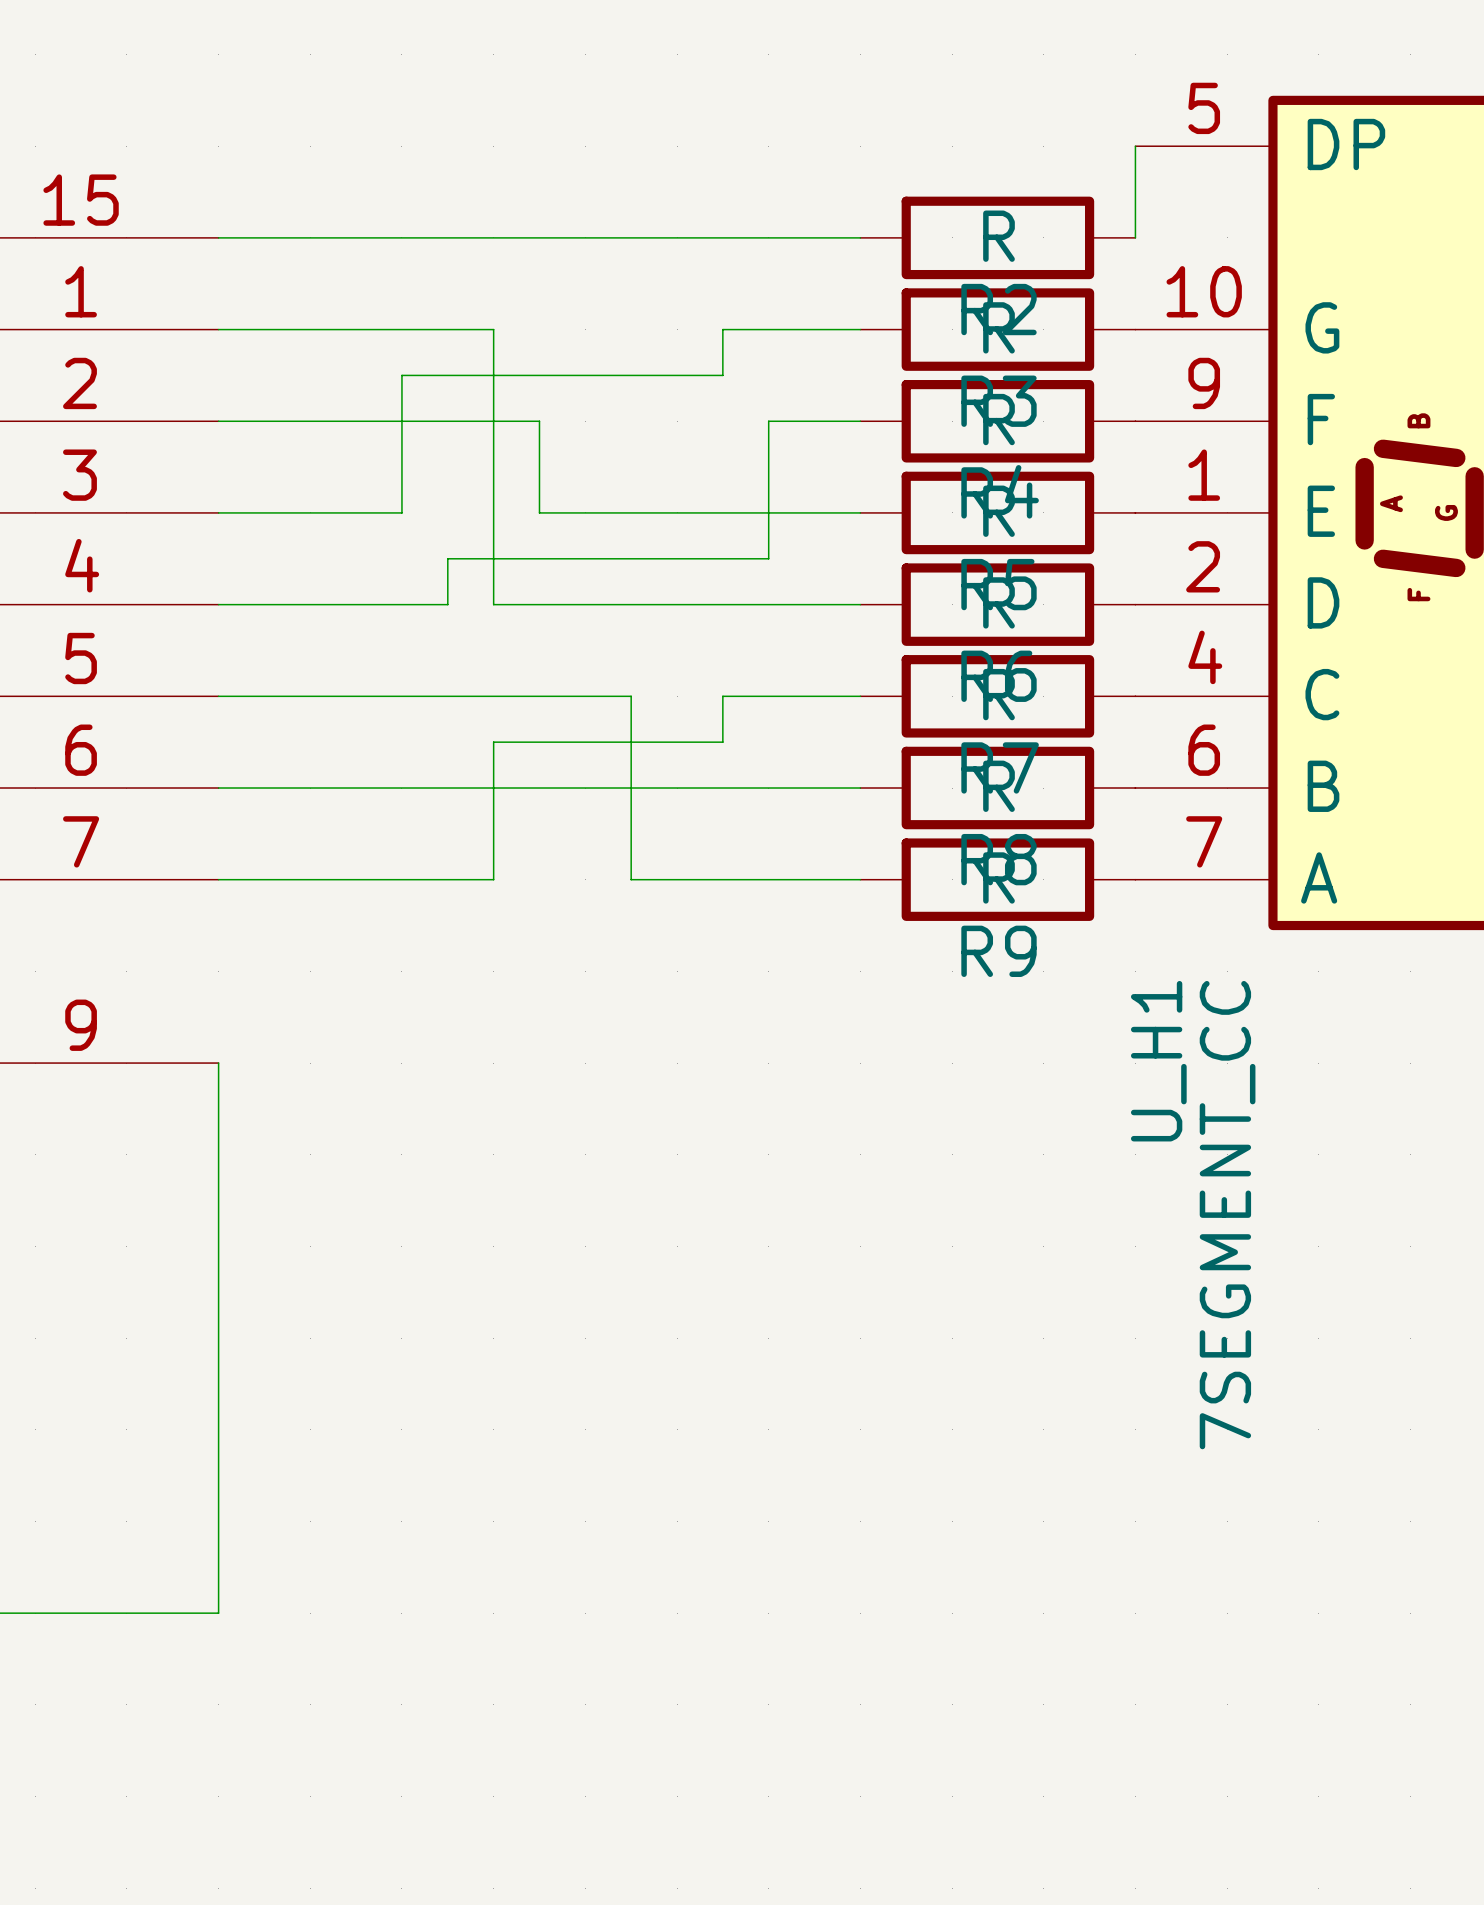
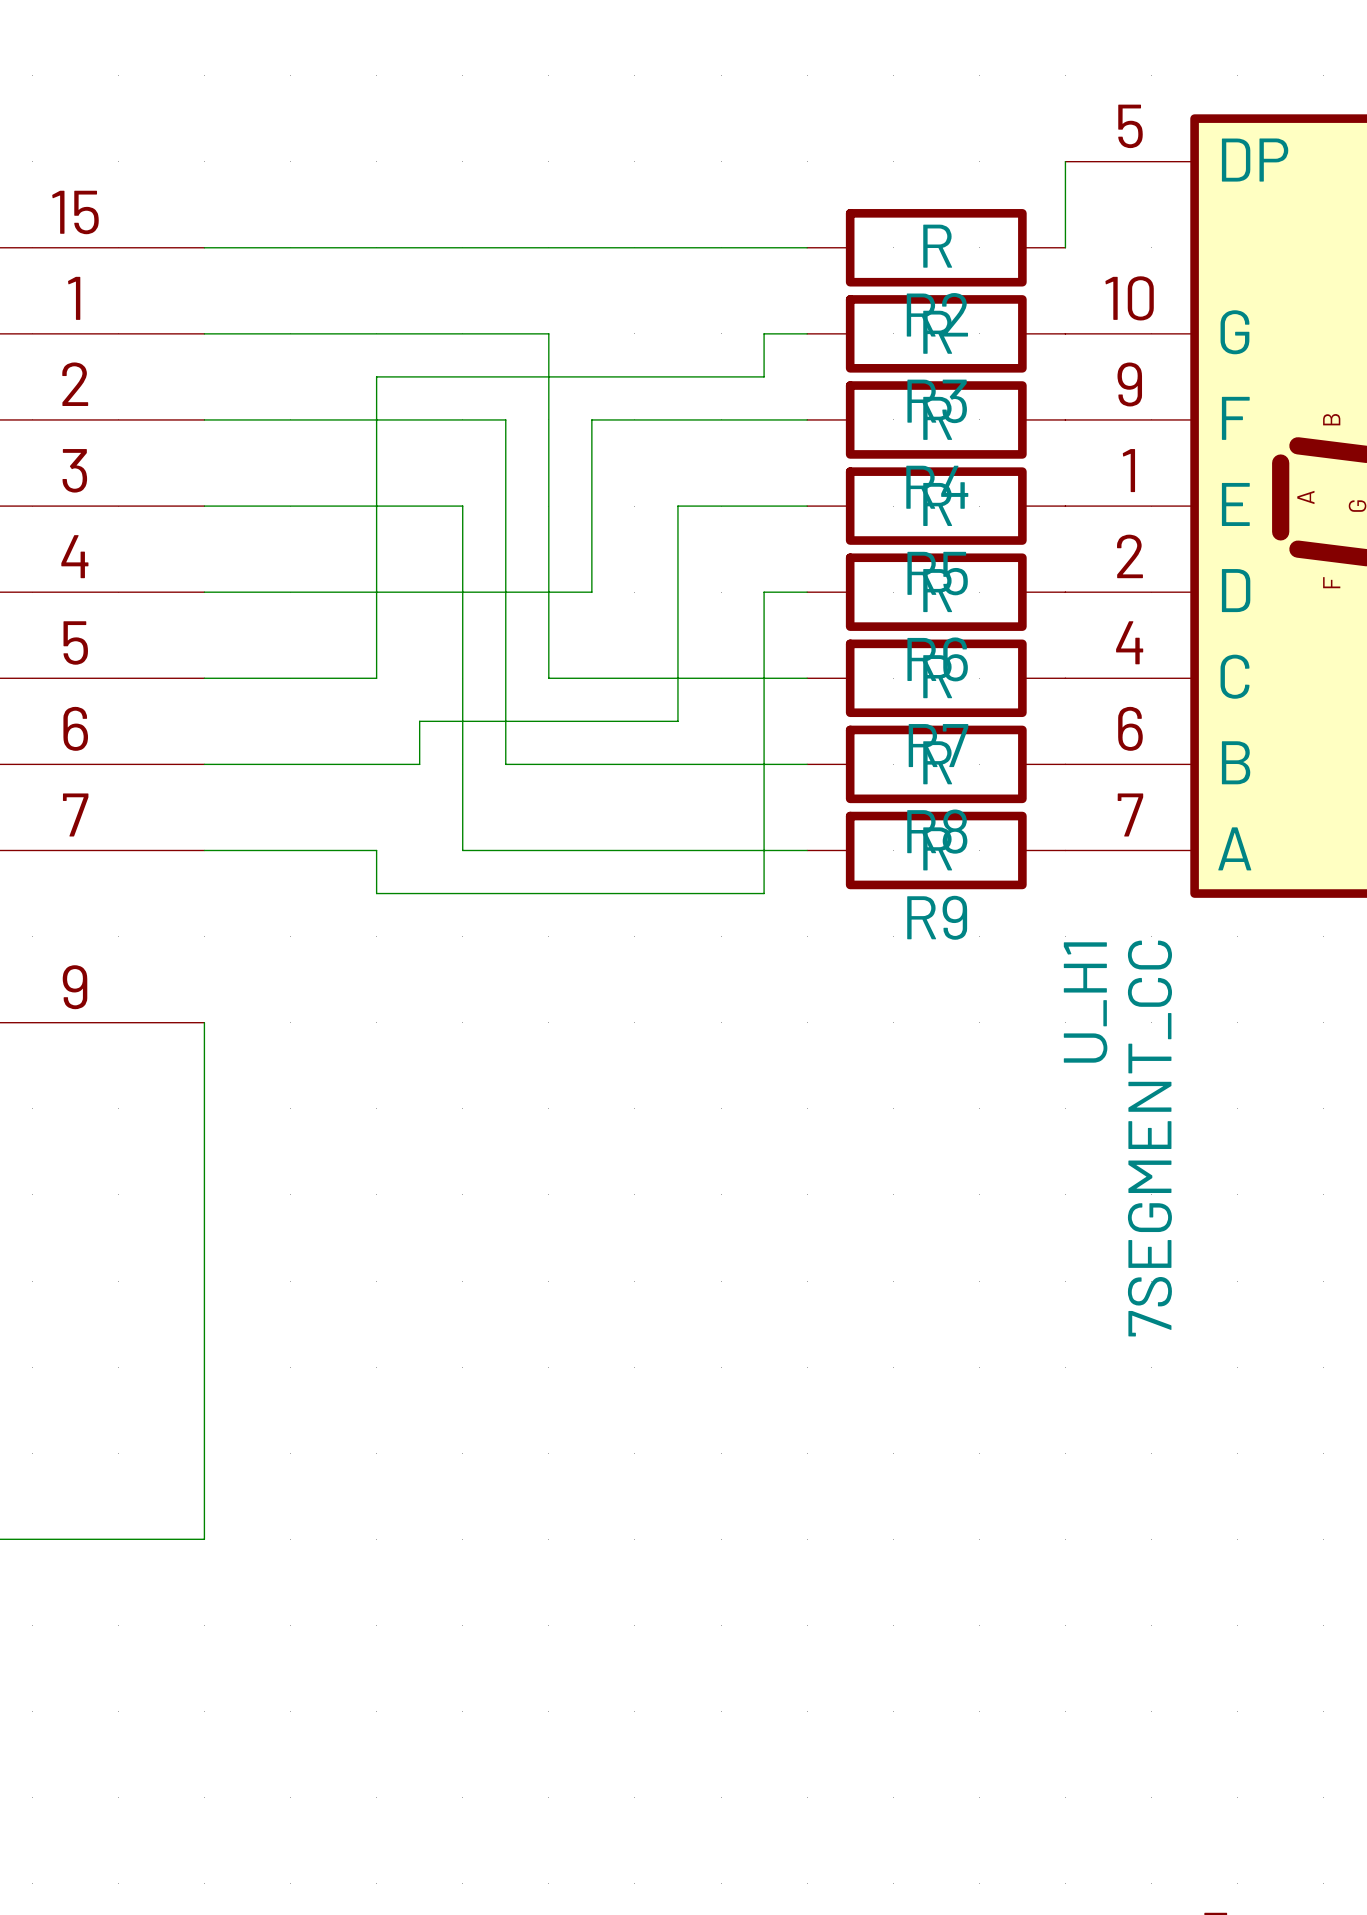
wire: (493, 329) (493, 512) -> (462, 333) (548, 333) (548, 678)
wire: (814, 329) (722, 329) (722, 375) -> (764, 333) (764, 376) (677, 376)
wire: (768, 421) (768, 558) (447, 558) (447, 604) -> (721, 419) (591, 419) (591, 592)
wire: (539, 512) (722, 512) -> (591, 678) (677, 678) (677, 506)
wire: none -> (505, 506) (505, 764)
wire: (631, 604) (814, 604) -> (376, 850) (376, 893) (764, 893) (764, 592)
wire: (401, 696) (585, 696) -> (376, 678) (376, 506) (462, 506)
wire: (631, 696) (631, 879) -> (462, 850) (591, 850)
wire: (447, 788) (539, 788) -> (419, 764) (419, 721) (462, 721) (462, 592) (419, 592)
wire: (401, 879) (493, 879) -> none

